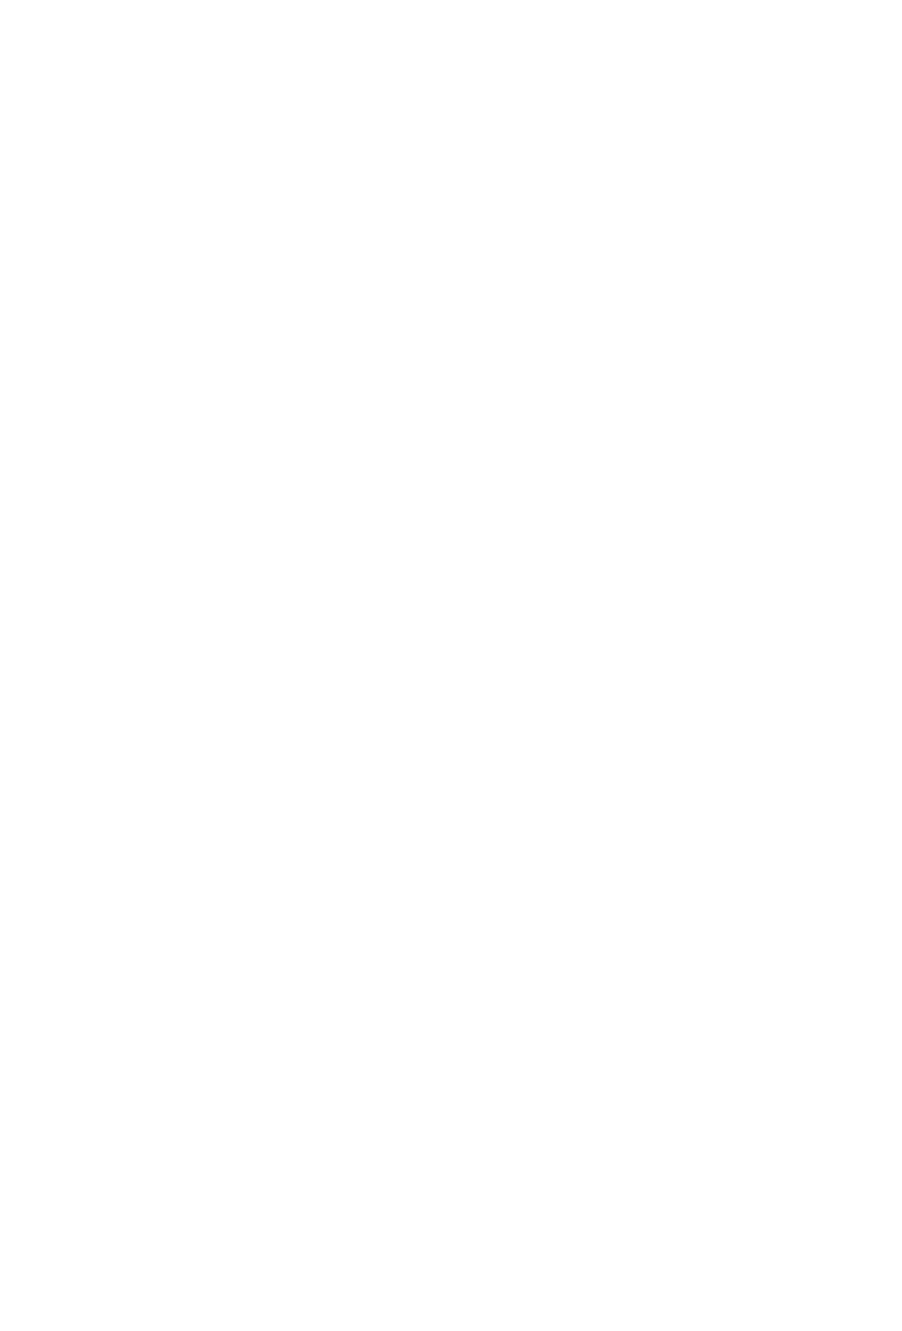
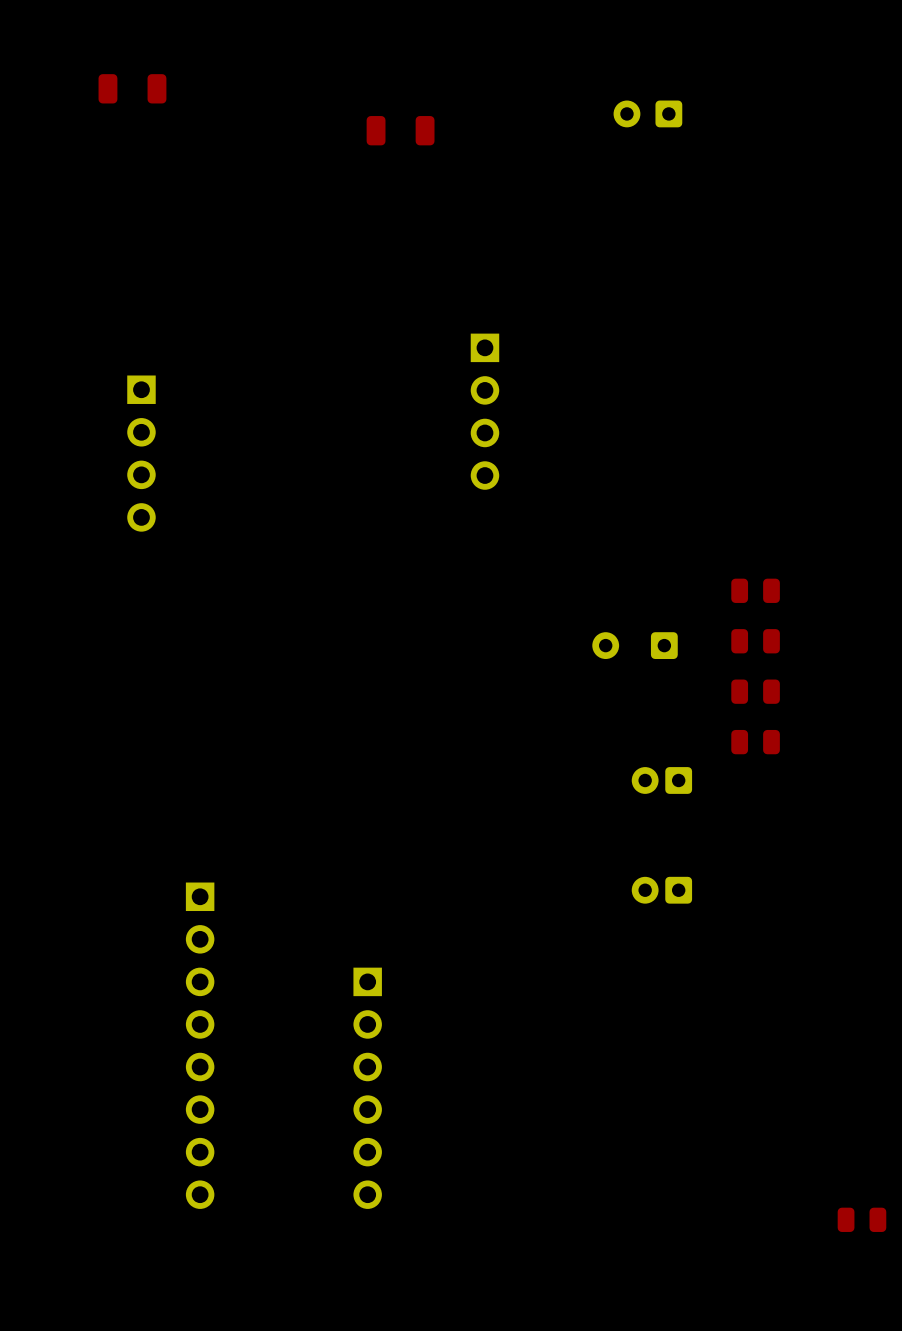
part: none -> (132, 88)
part: none -> (647, 113)
part: none -> (400, 130)
part: none -> (484, 411)
part: none -> (141, 453)
part: none -> (755, 590)
part: none -> (755, 641)
part: none -> (635, 645)
part: none -> (755, 691)
part: none -> (755, 742)
part: none -> (661, 780)
part: none -> (661, 890)
part: none -> (200, 1045)
part: none -> (367, 1088)
part: none -> (861, 1219)

